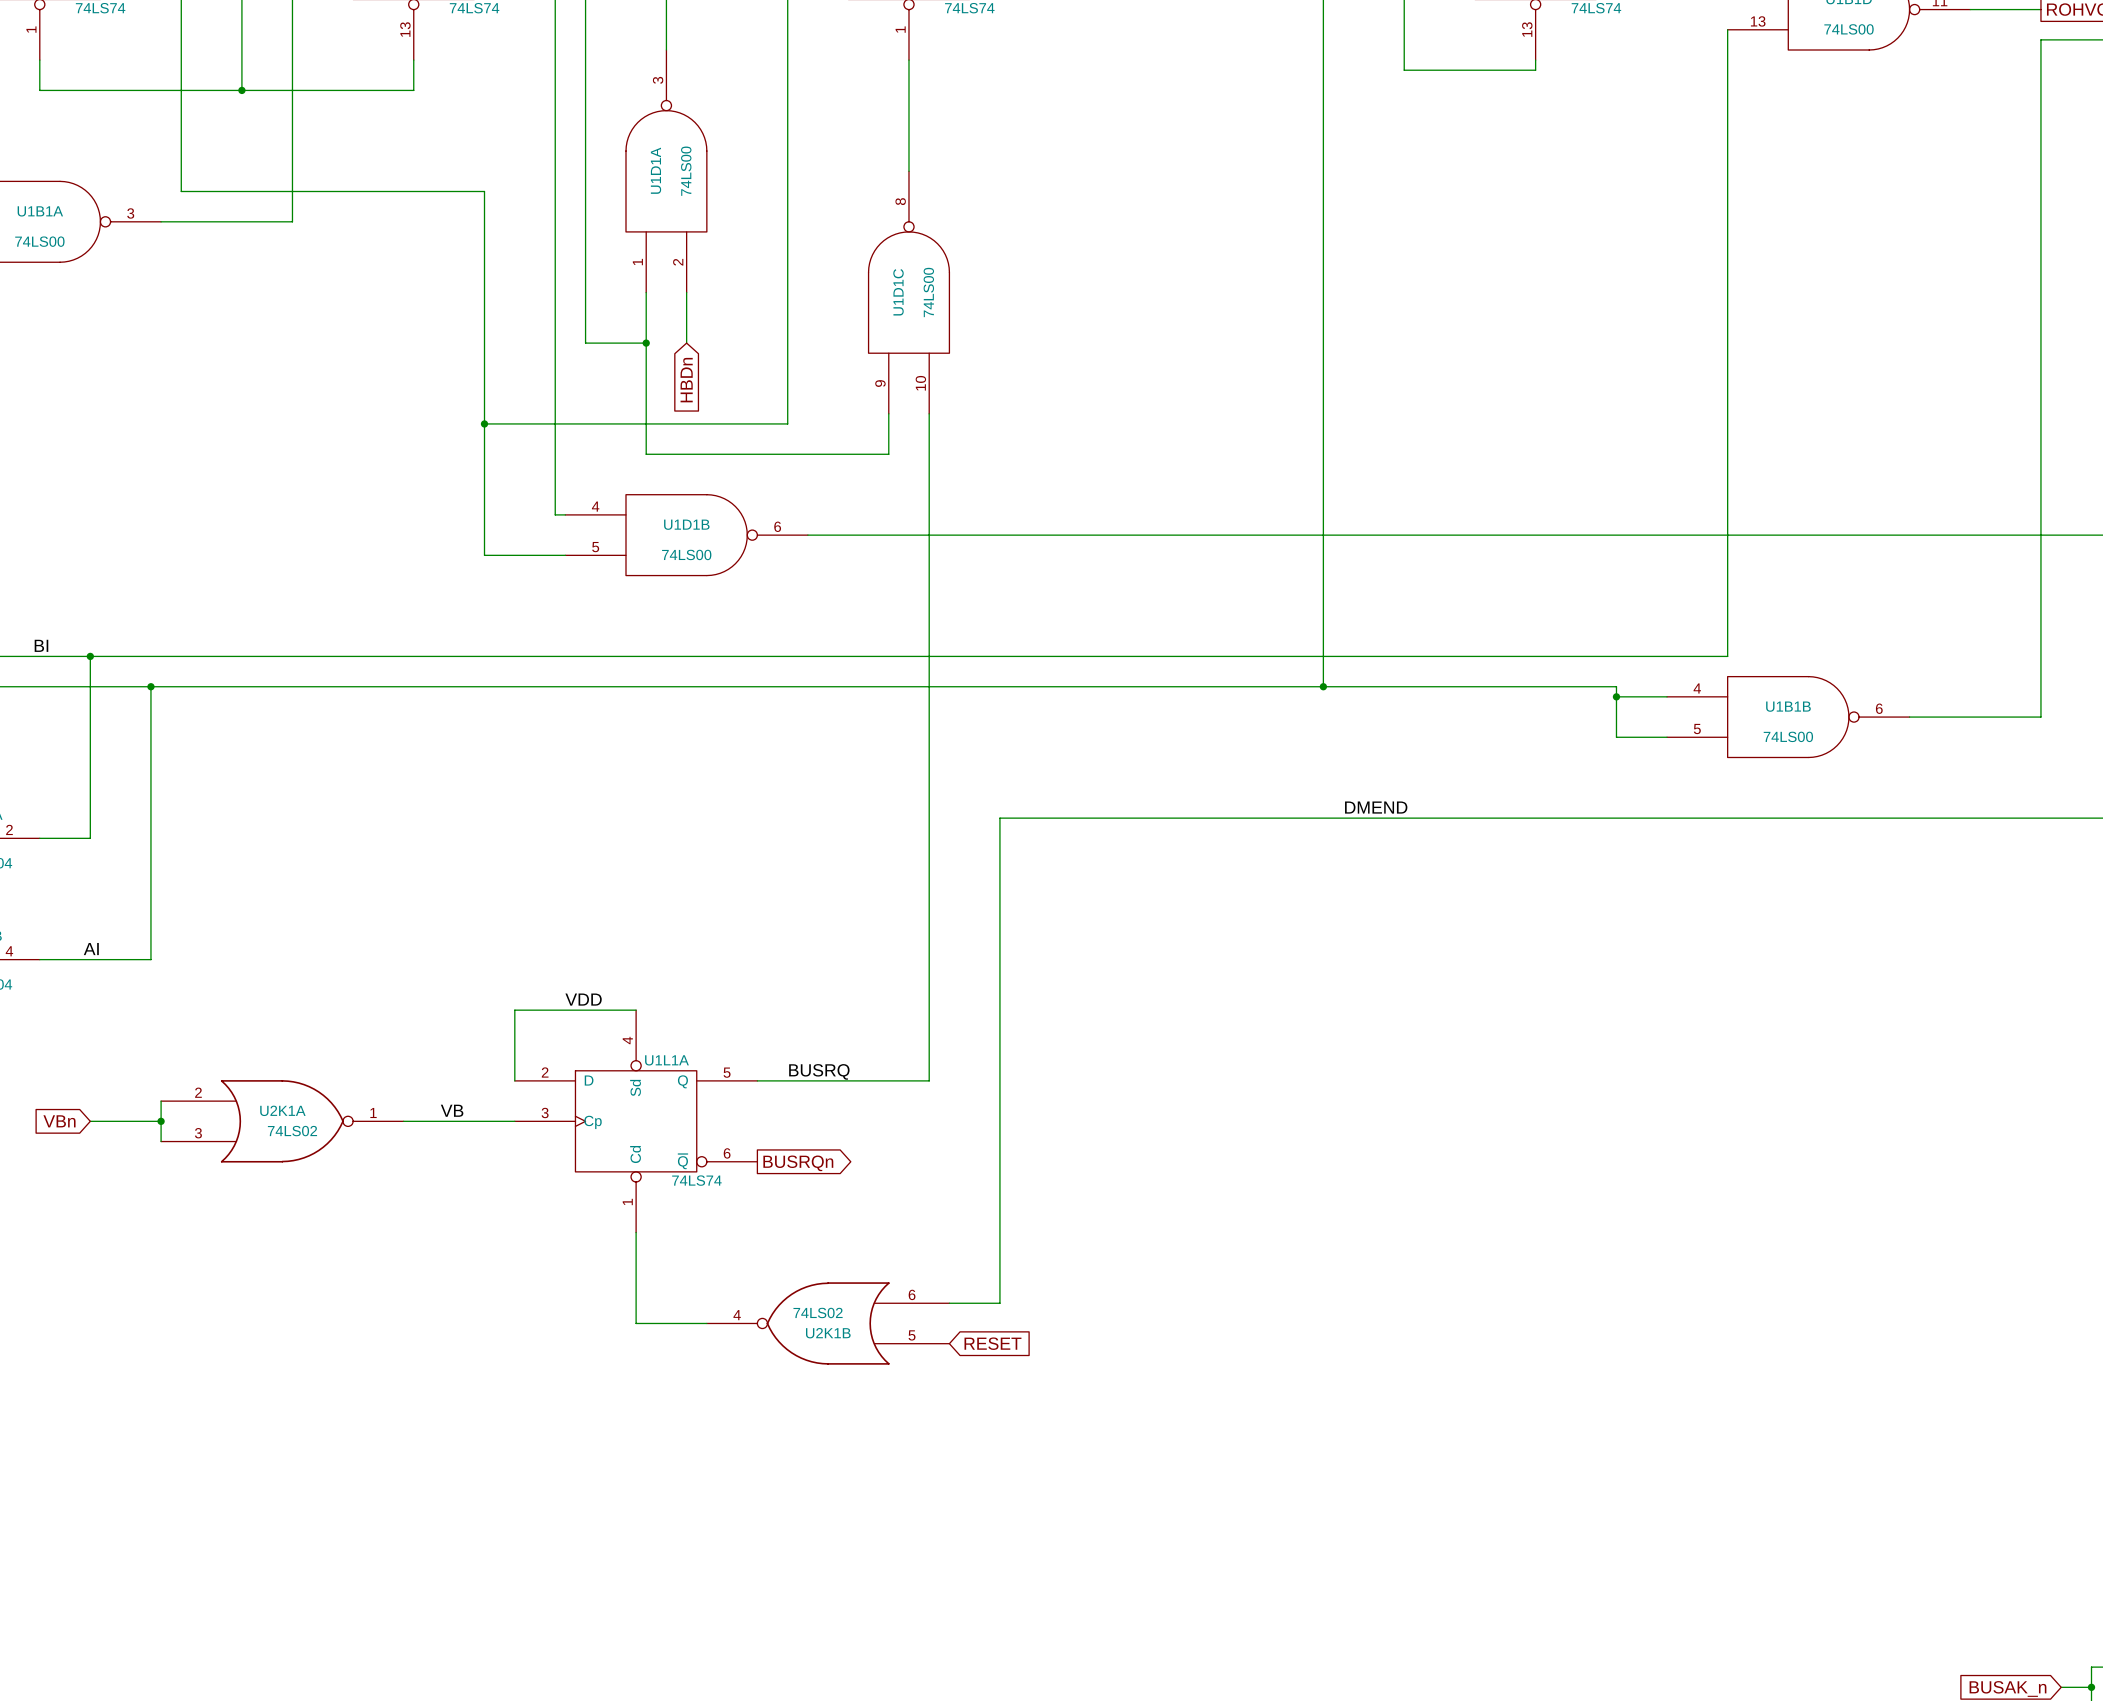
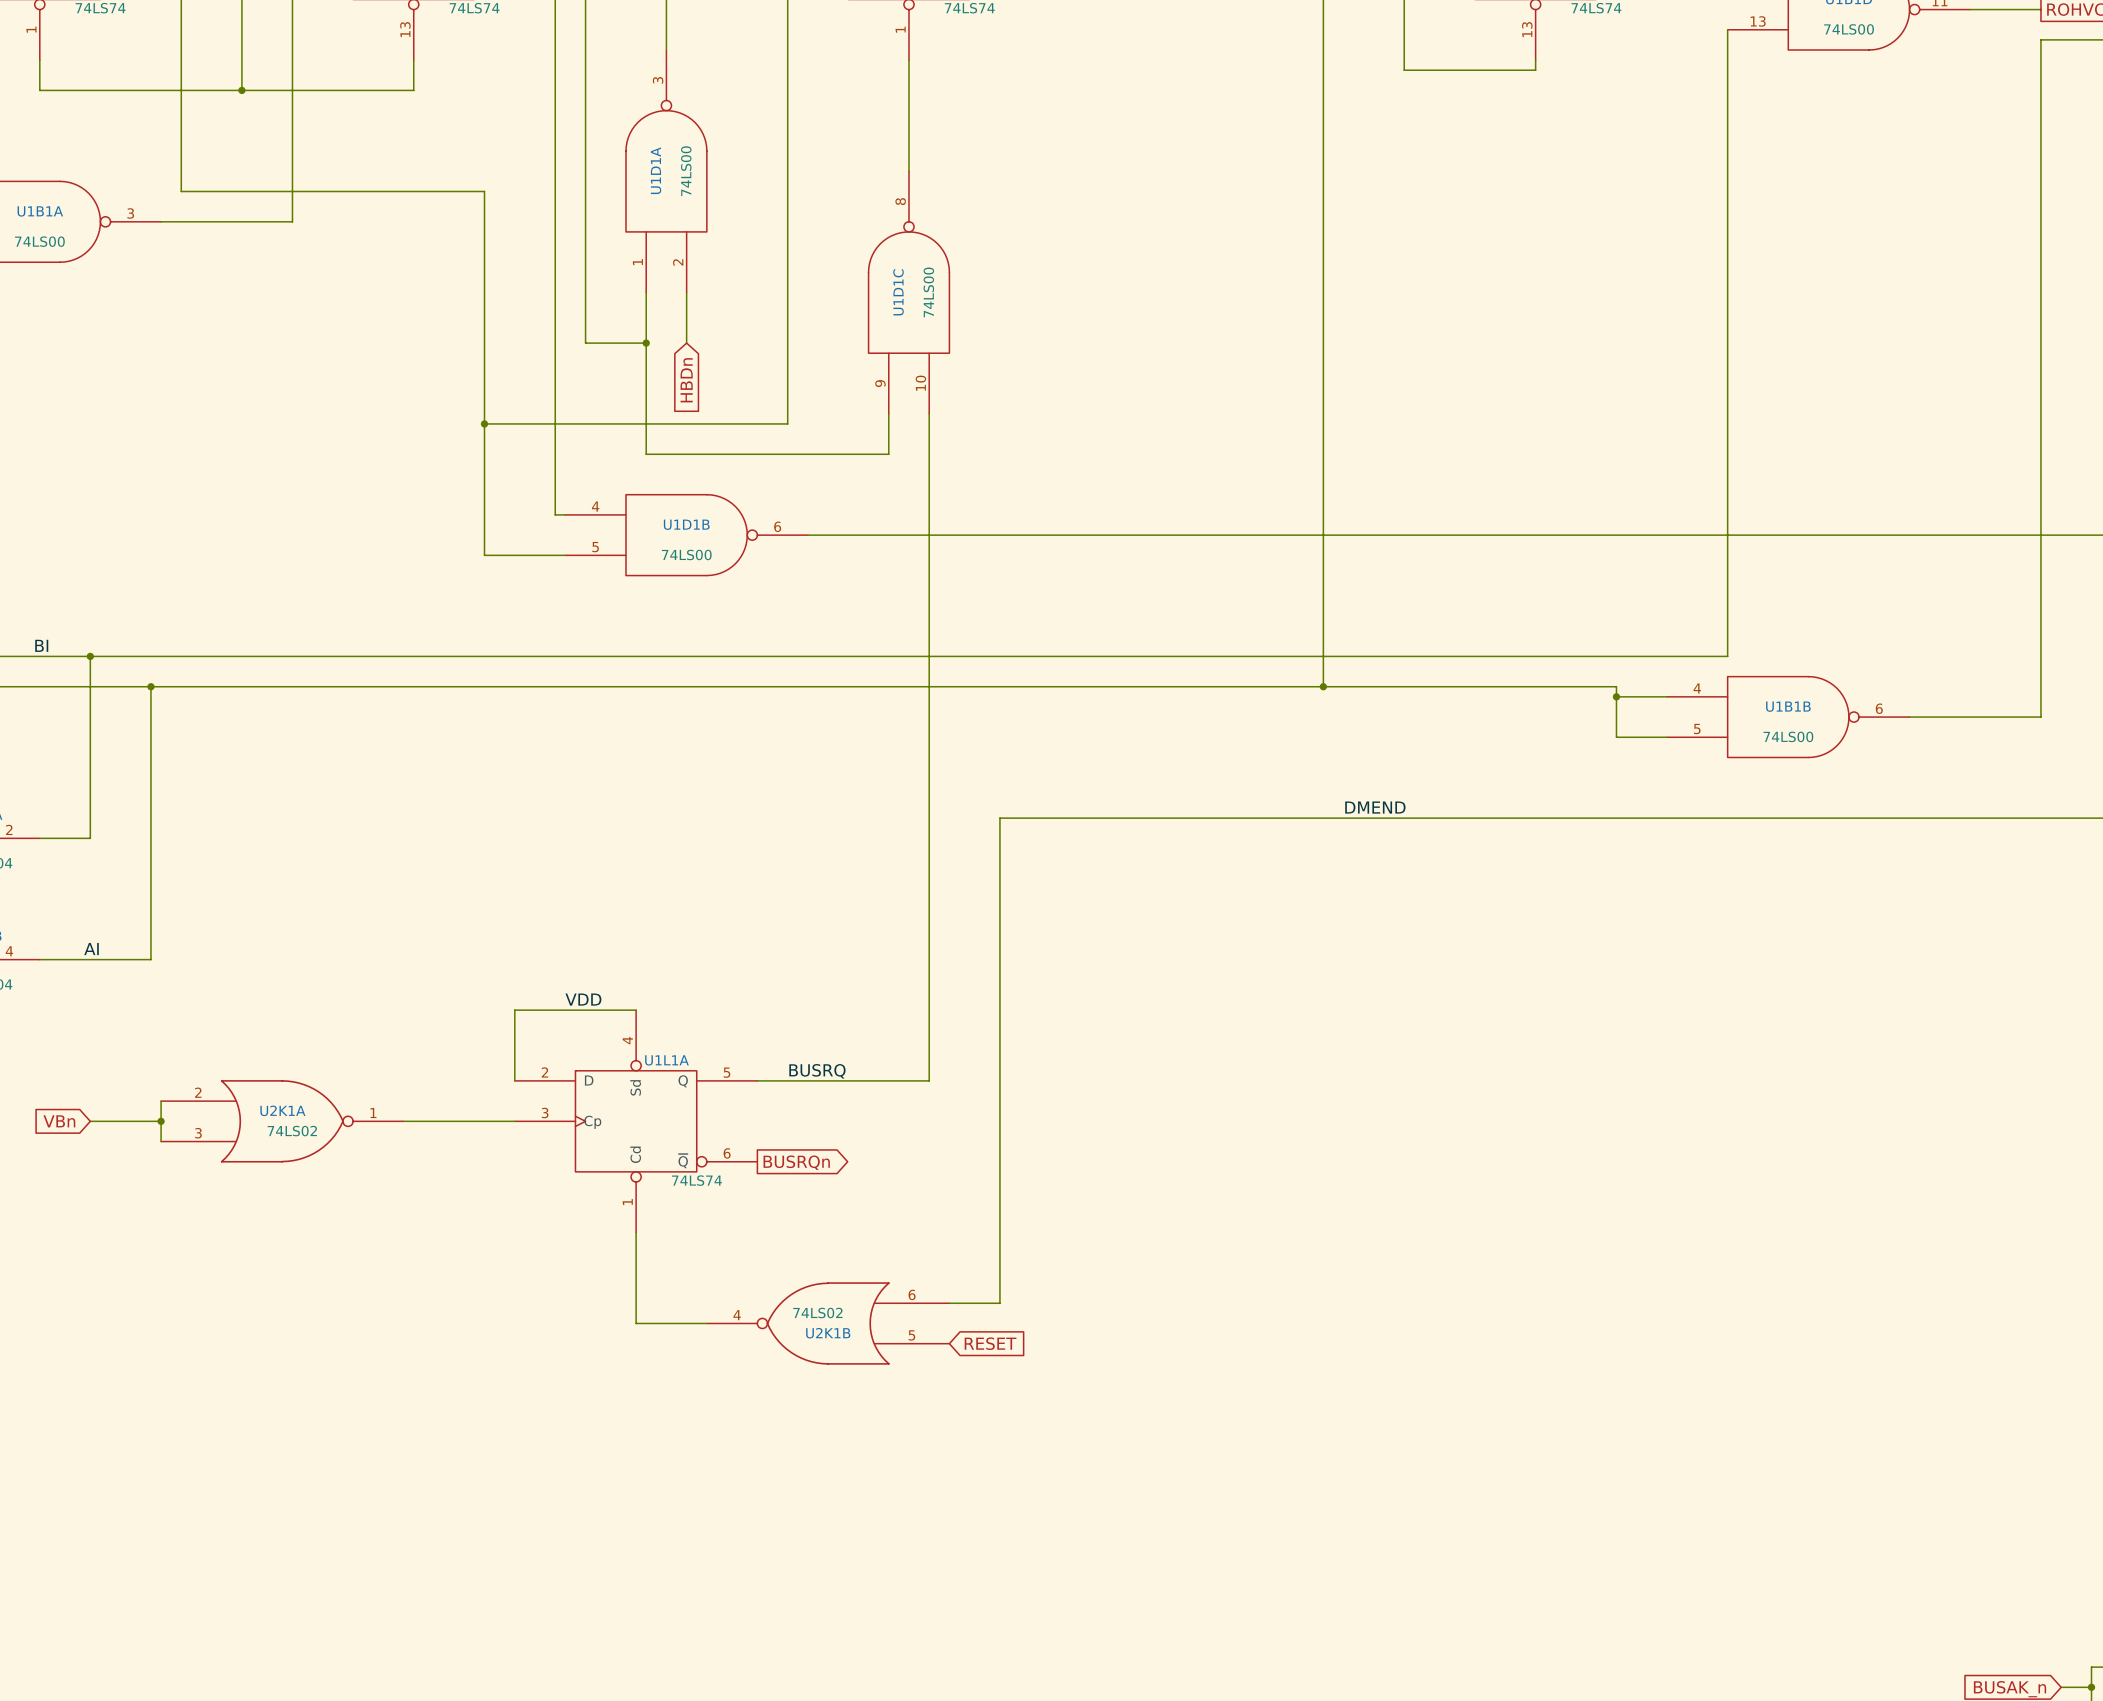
label: VB (452, 1110) -> none

